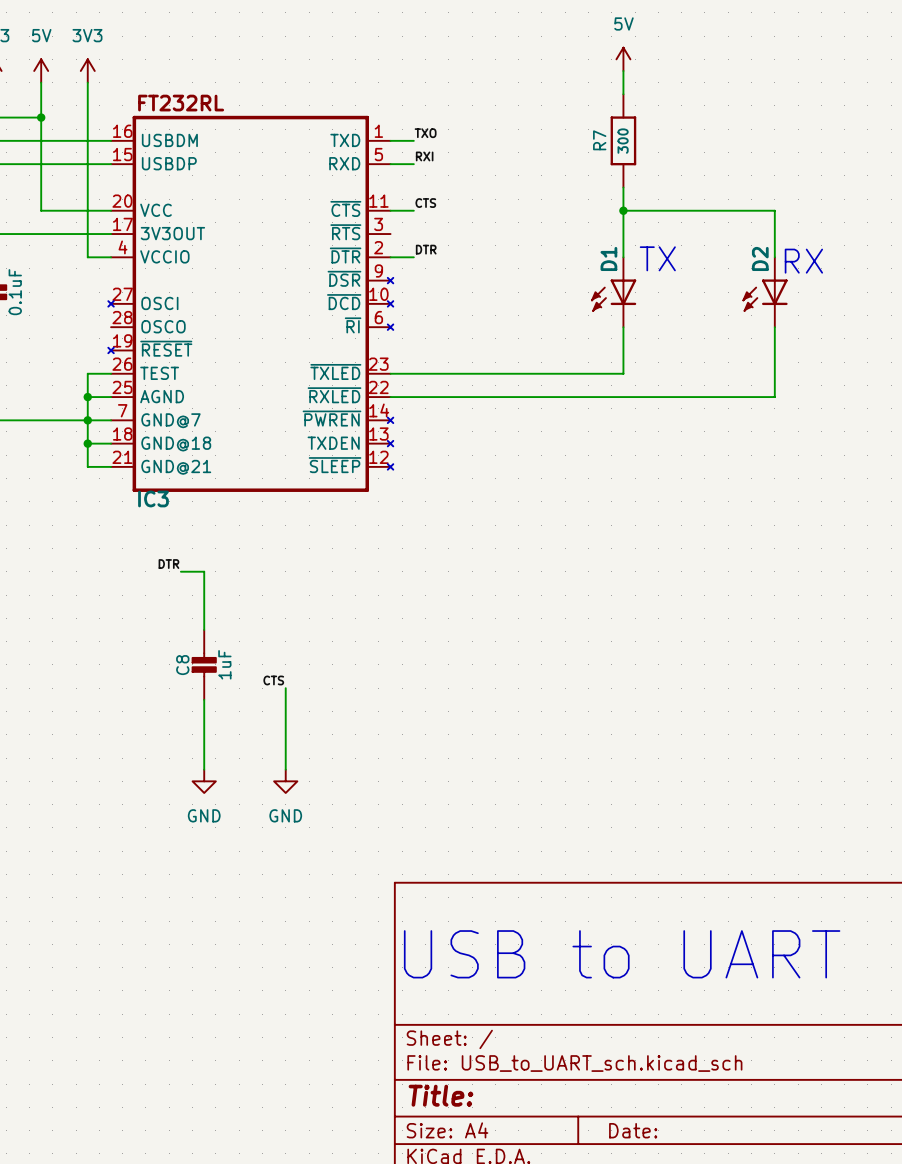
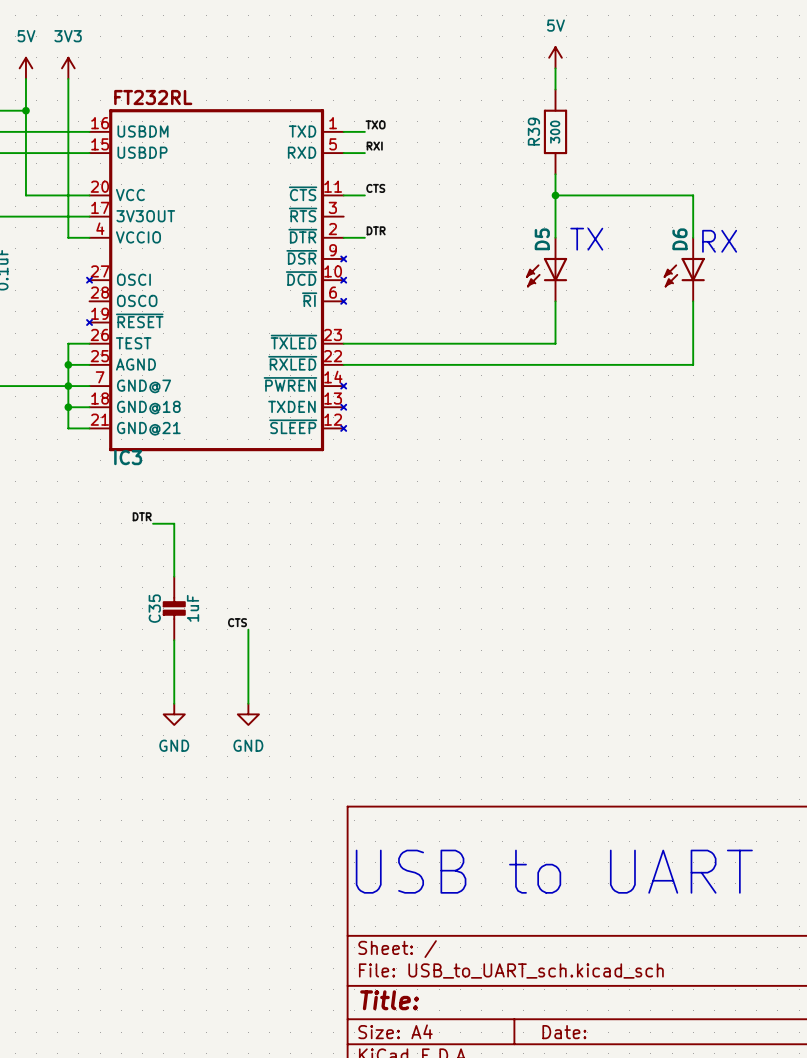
R7 name: R7 (599, 140) -> R39 (533, 131)
D1 name: D1 (608, 258) -> D5 (542, 239)
D2 name: D2 (760, 258) -> D6 (679, 239)
C8 name: C8 (182, 665) -> C35 (154, 608)

